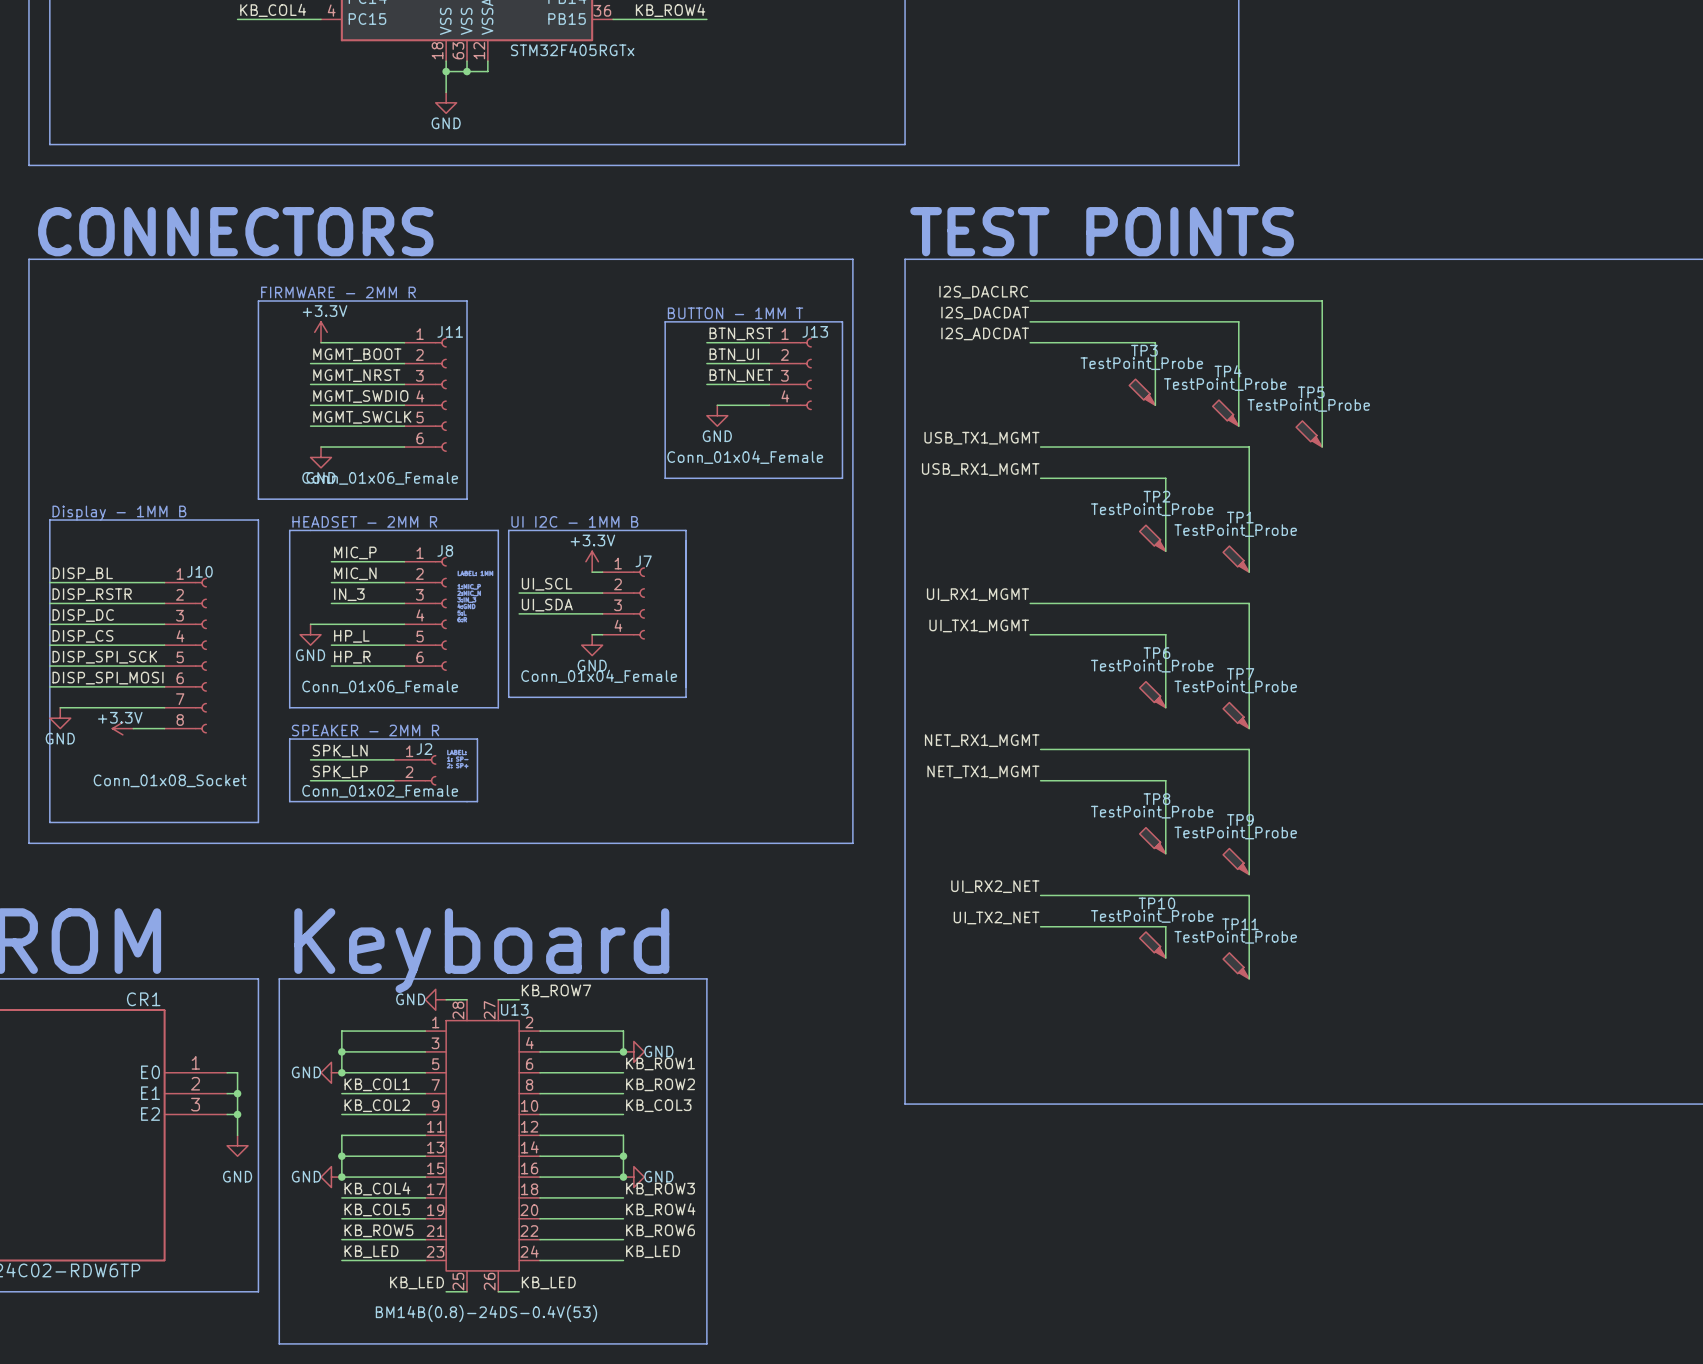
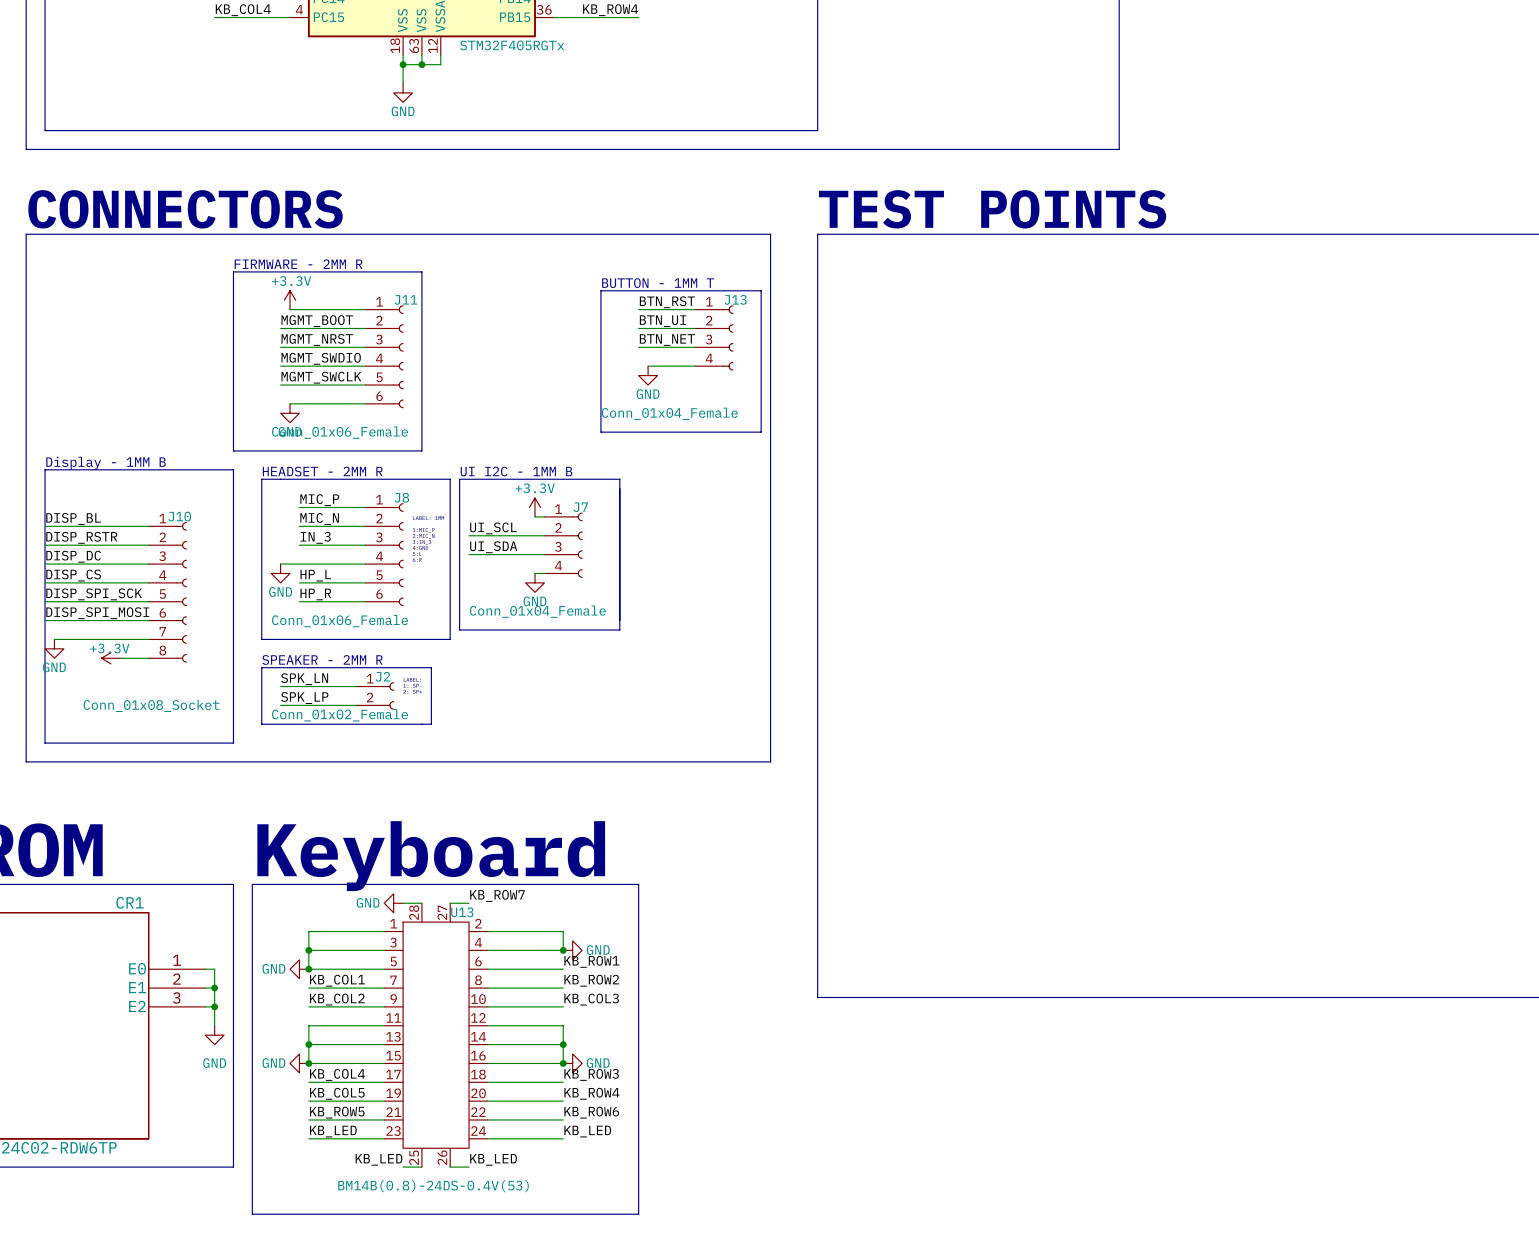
label: I2S_DACLRC (983, 292) -> none
wire: (1030, 301) (1322, 301) (1322, 447) -> none
label: I2S_DACDAT (985, 313) -> none
wire: (1030, 321) (1238, 321) (1238, 426) -> none
label: I2S_ADCDAT (985, 333) -> none
wire: (1030, 342) (1155, 342) (1155, 405) -> none
TP3: TestPoint_Probe (1142, 392) -> none
TP4: TestPoint_Probe (1225, 413) -> none
TP5: TestPoint_Probe (1309, 433) -> none
label: USB_TX1_MGMT (981, 438) -> none
wire: (1040, 447) (1249, 447) (1249, 572) -> none
label: USB_RX1_MGMT (980, 469) -> none
wire: (1040, 478) (1165, 478) (1165, 551) -> none
TP2: TestPoint_Probe (1152, 538) -> none
TP1: TestPoint_Probe (1236, 559) -> none
label: UI_RX1_MGMT (977, 594) -> none
wire: (1030, 603) (1249, 603) (1249, 728) -> none
label: UI_TX1_MGMT (979, 625) -> none
wire: (1030, 634) (1165, 634) (1165, 707) -> none
TP6: TestPoint_Probe (1152, 694) -> none
TP7: TestPoint_Probe (1236, 715) -> none
label: NET_RX1_MGMT (982, 740) -> none
wire: (1040, 749) (1249, 749) (1249, 874) -> none
label: NET_TX1_MGMT (983, 771) -> none
wire: (1040, 780) (1165, 780) (1165, 853) -> none
TP8: TestPoint_Probe (1152, 840) -> none
TP9: TestPoint_Probe (1236, 861) -> none
label: UI_RX2_NET (995, 886) -> none
wire: (1040, 895) (1249, 895) (1249, 978) -> none
label: UI_TX2_NET (996, 917) -> none
wire: (1040, 926) (1165, 926) (1165, 958) -> none
TP10: TestPoint_Probe (1152, 945) -> none
TP11: TestPoint_Probe (1236, 965) -> none

